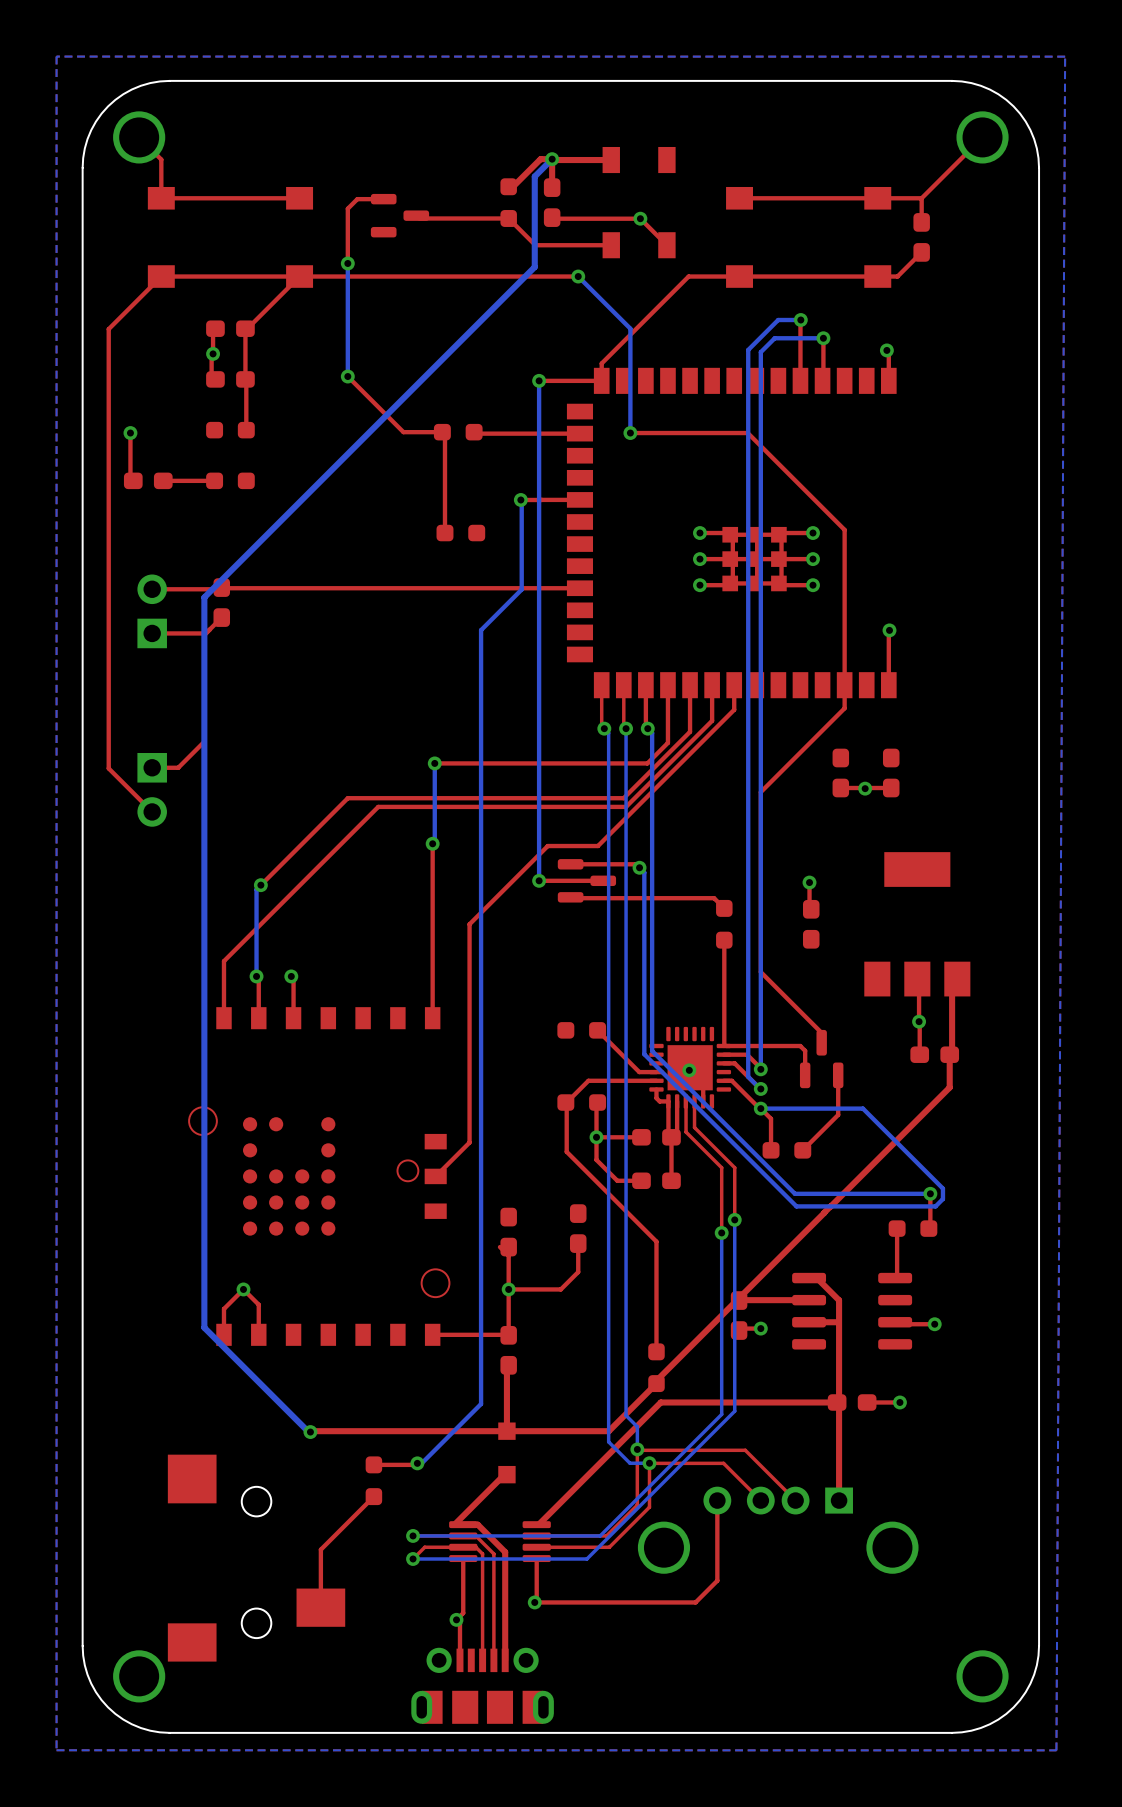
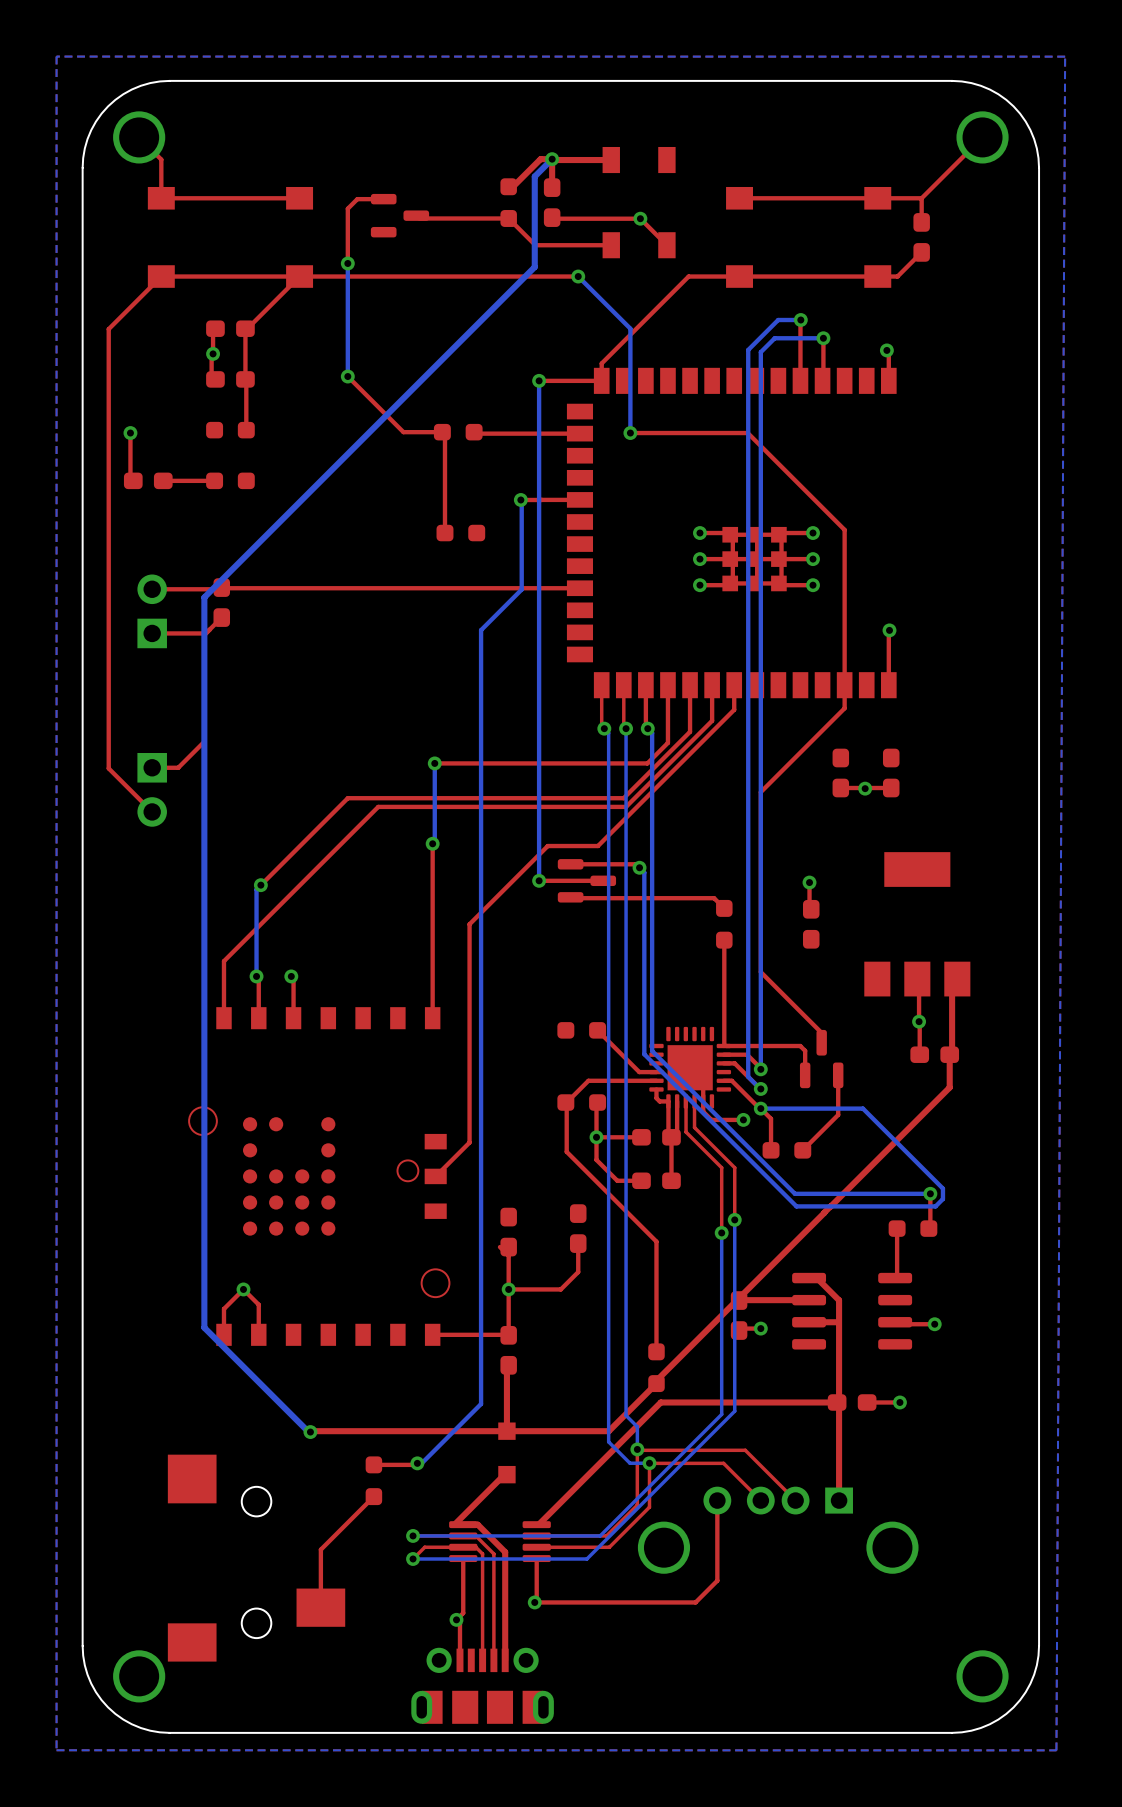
via position: (689, 1070) -> (743, 1119)
top track: none -> (703, 1101) (703, 1111) (711, 1119) (743, 1119)

